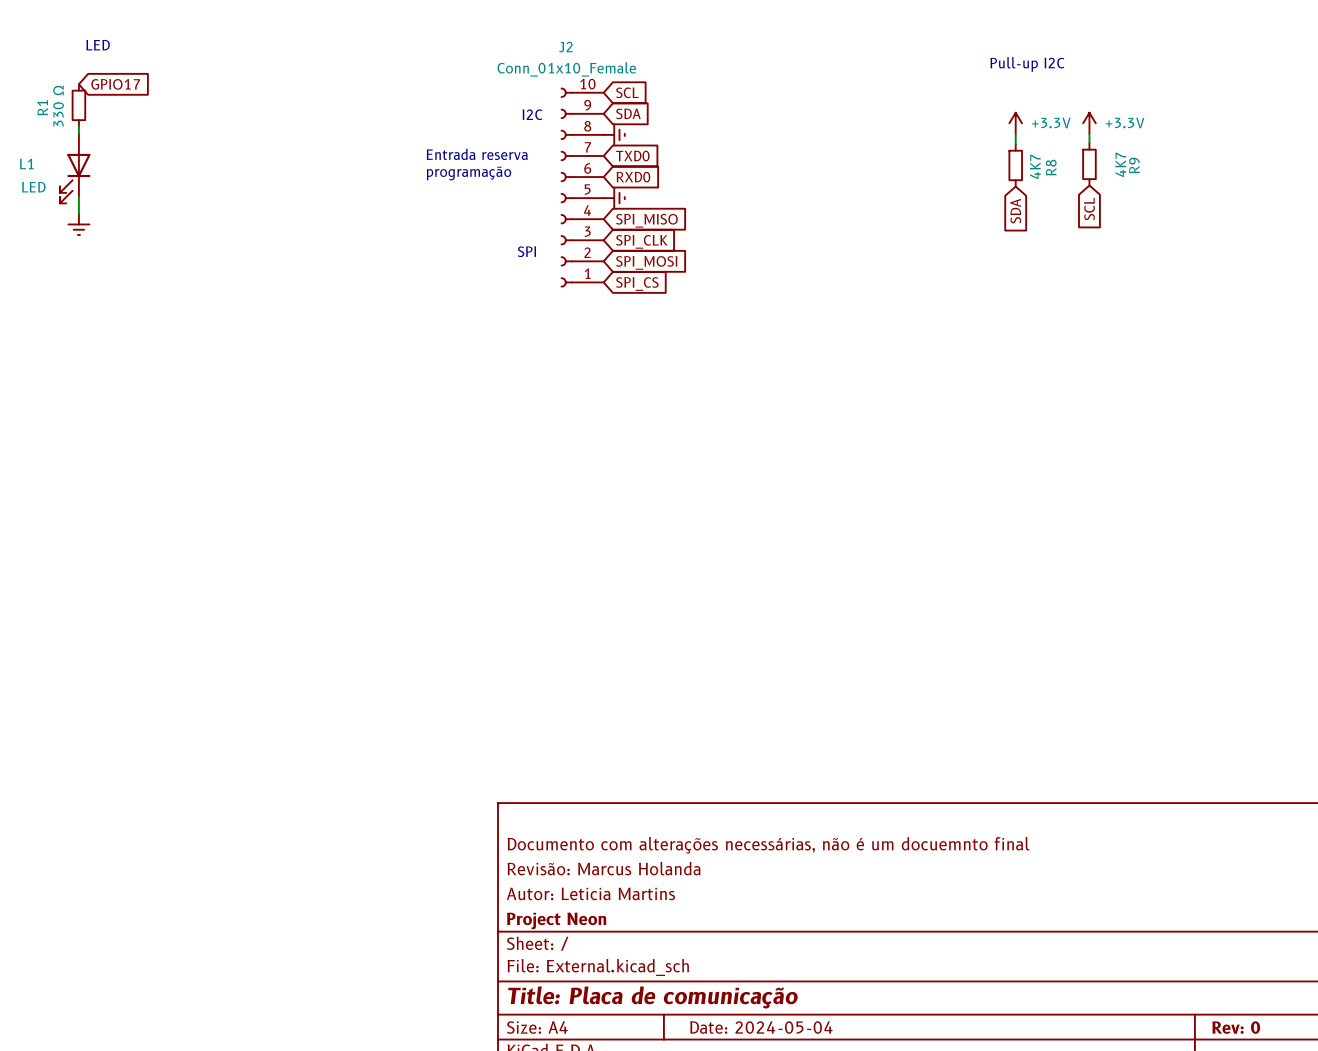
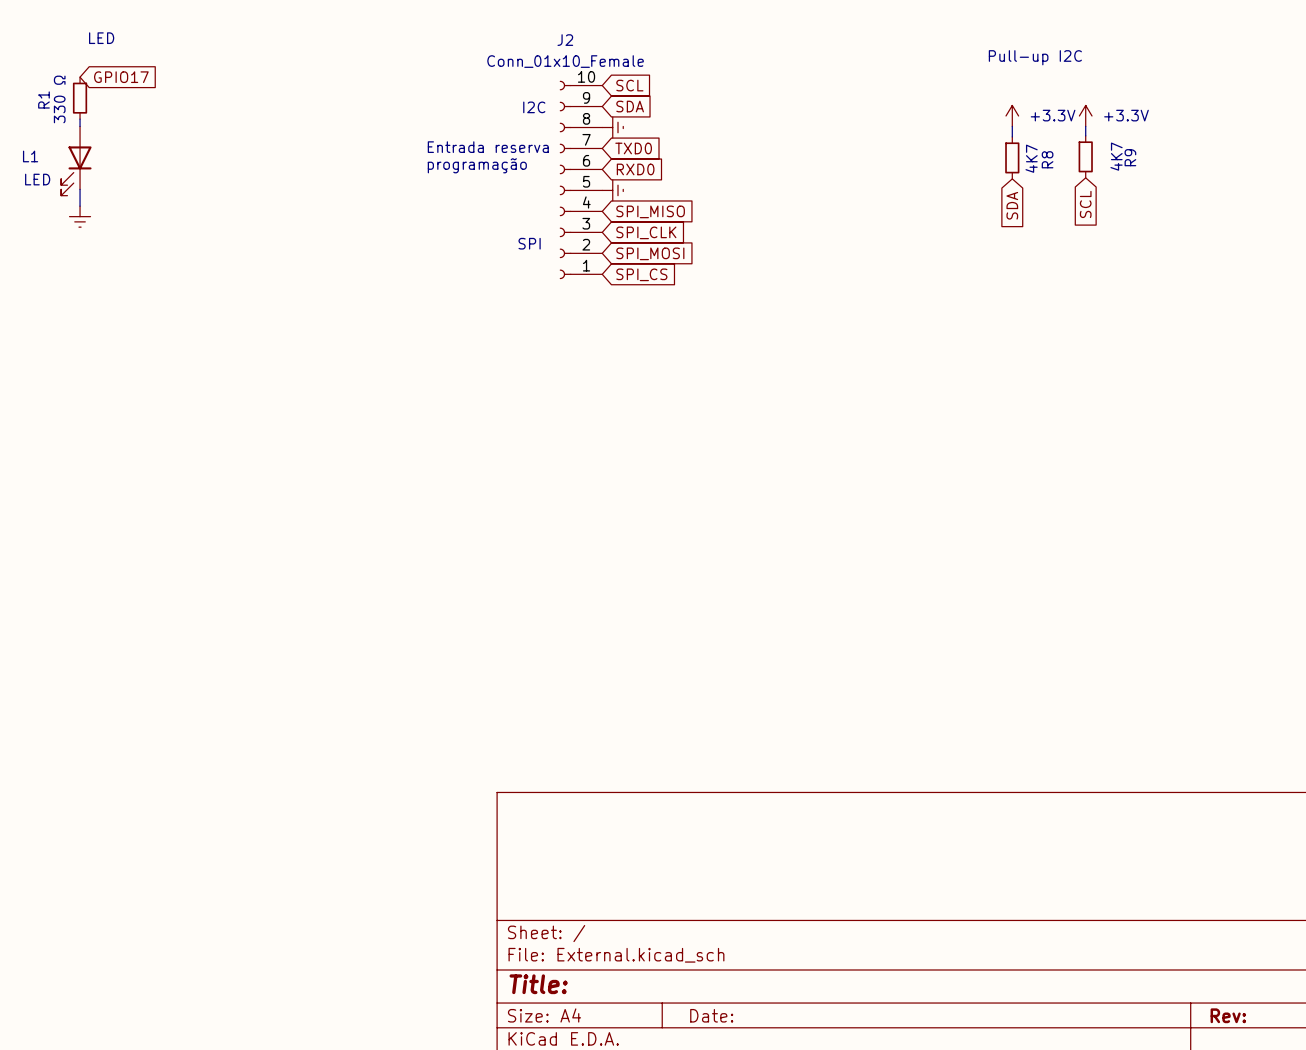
title block: Documento com alterações necessárias, não é um docuemnto final (768, 845) -> none
title block: Revisão: Marcus Holanda (604, 868) -> none
title block: Autor: Leticia Martins (590, 893) -> none
title block: Project Neon (556, 920) -> none
title block: Title: Placa de comunicação (652, 997) -> Title: (538, 984)
title block: Date: 2024-05-04 (761, 1027) -> Date: (711, 1015)
title block: Rev: 0 (1236, 1027) -> Rev: (1228, 1015)

